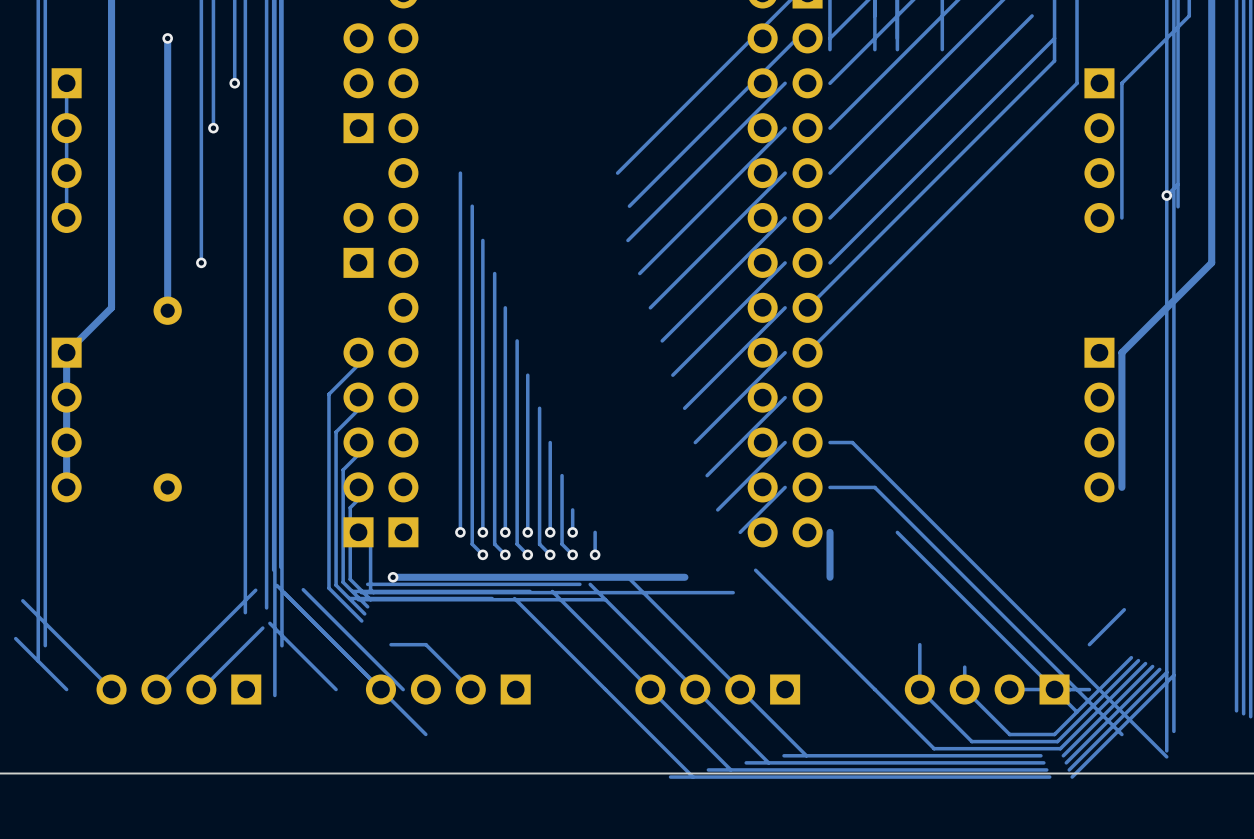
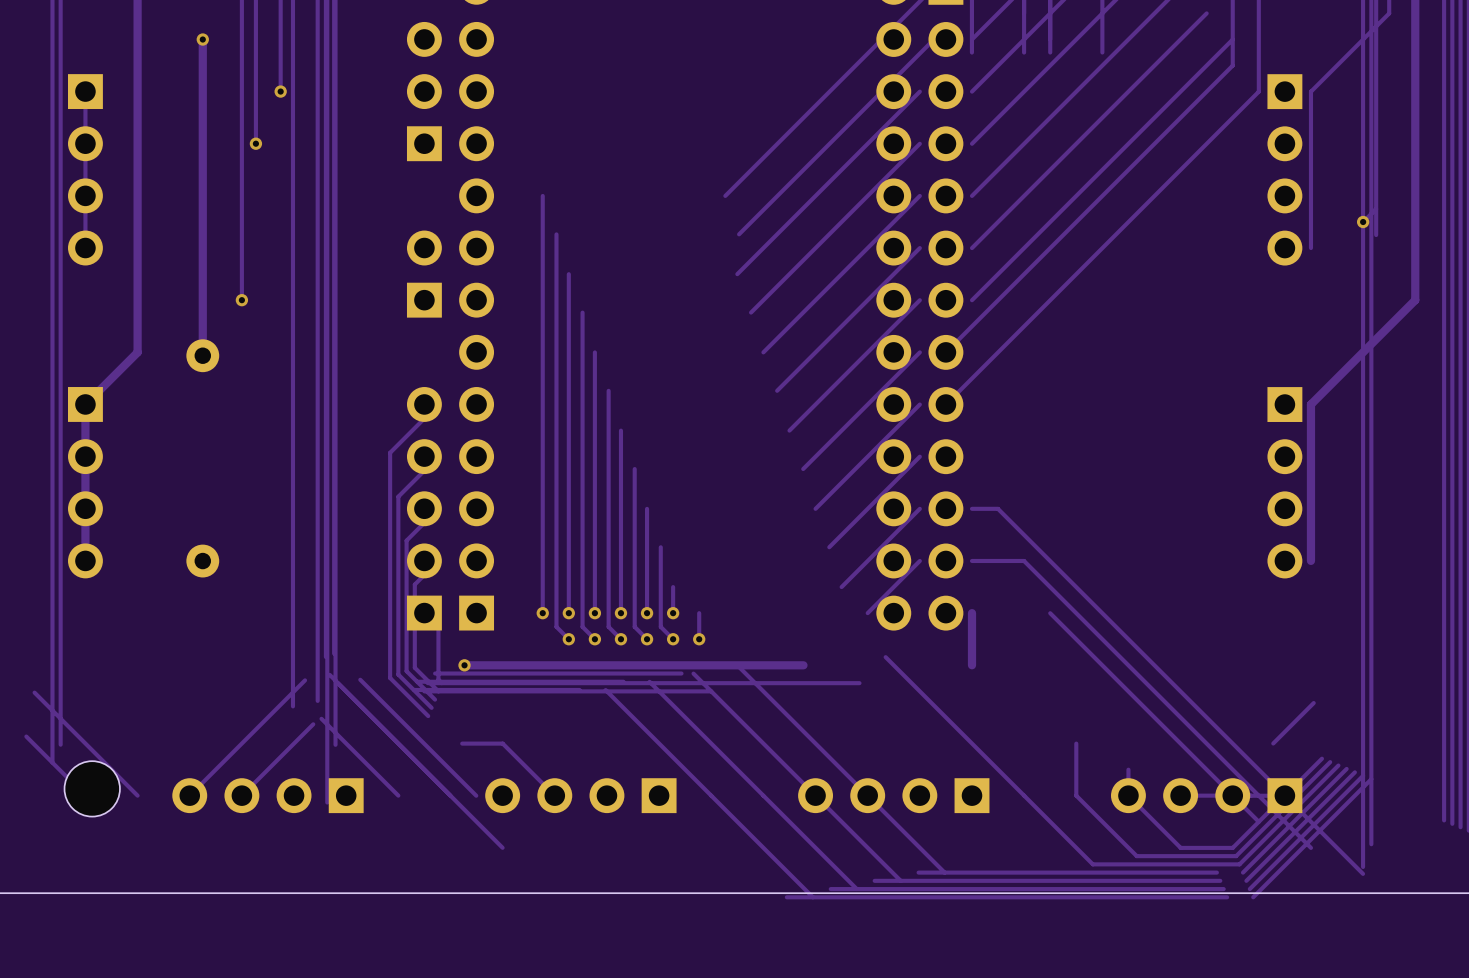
part: none -> (92, 788)
part position: (178, 689) -> (267, 795)
part position: (448, 689) -> (580, 795)
part position: (717, 689) -> (893, 795)
part position: (987, 689) -> (1206, 795)

